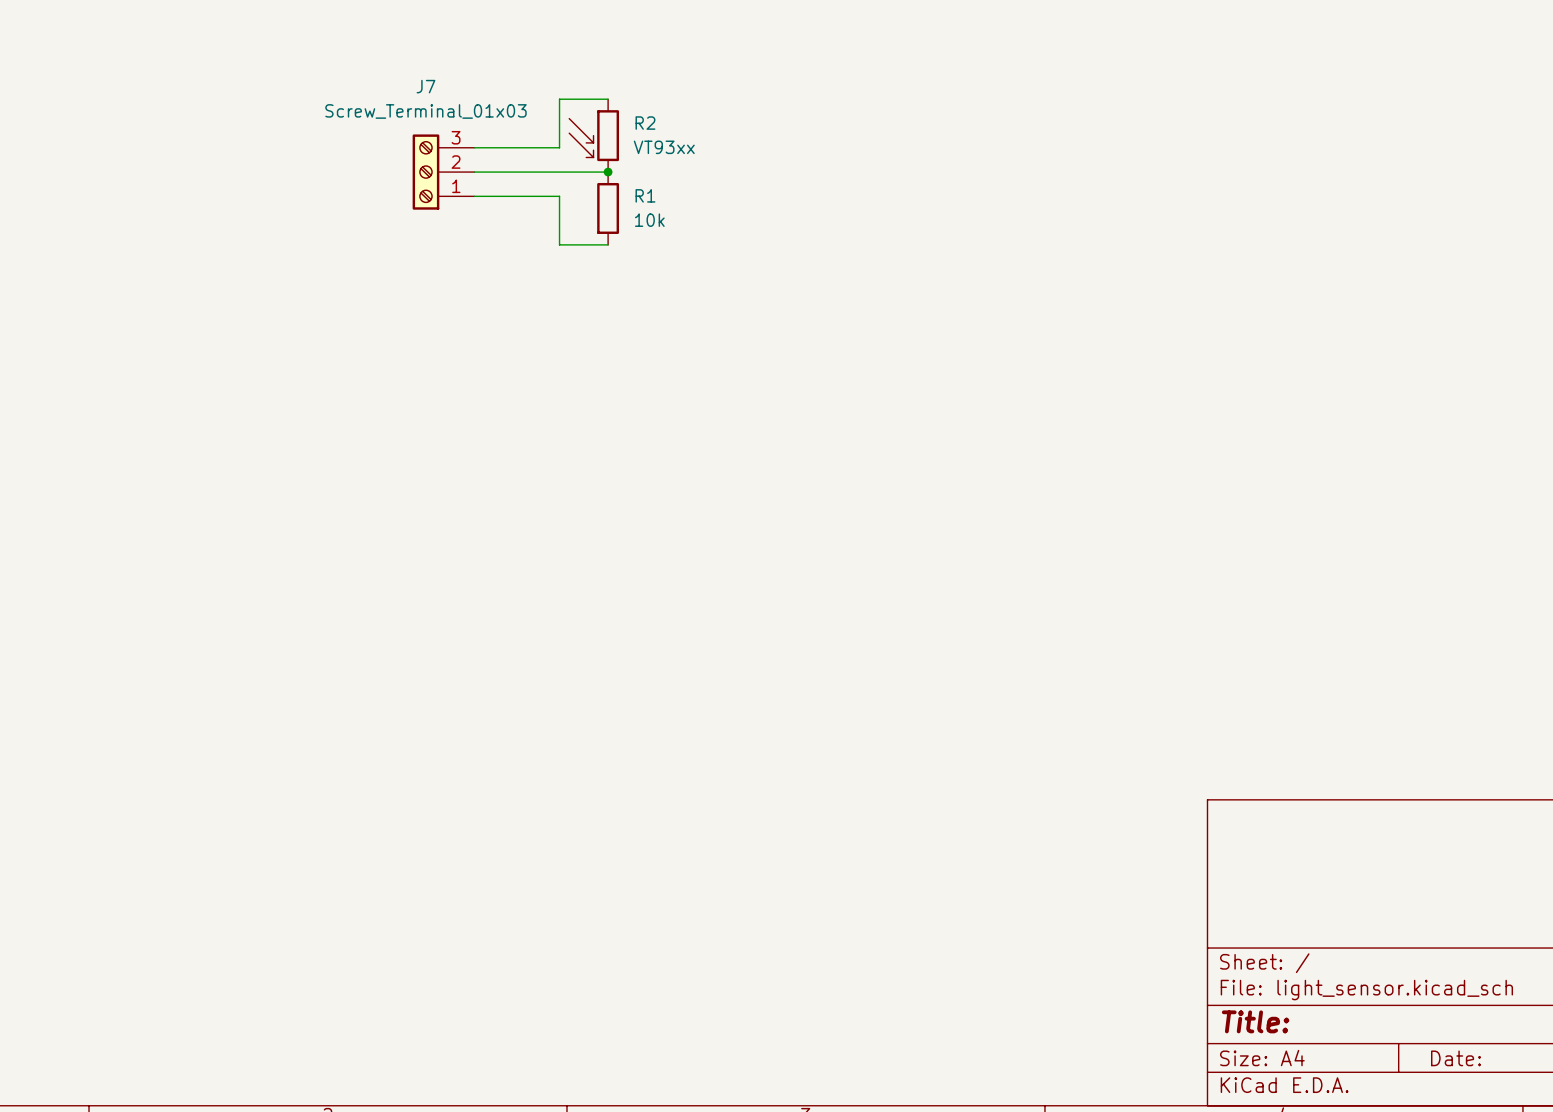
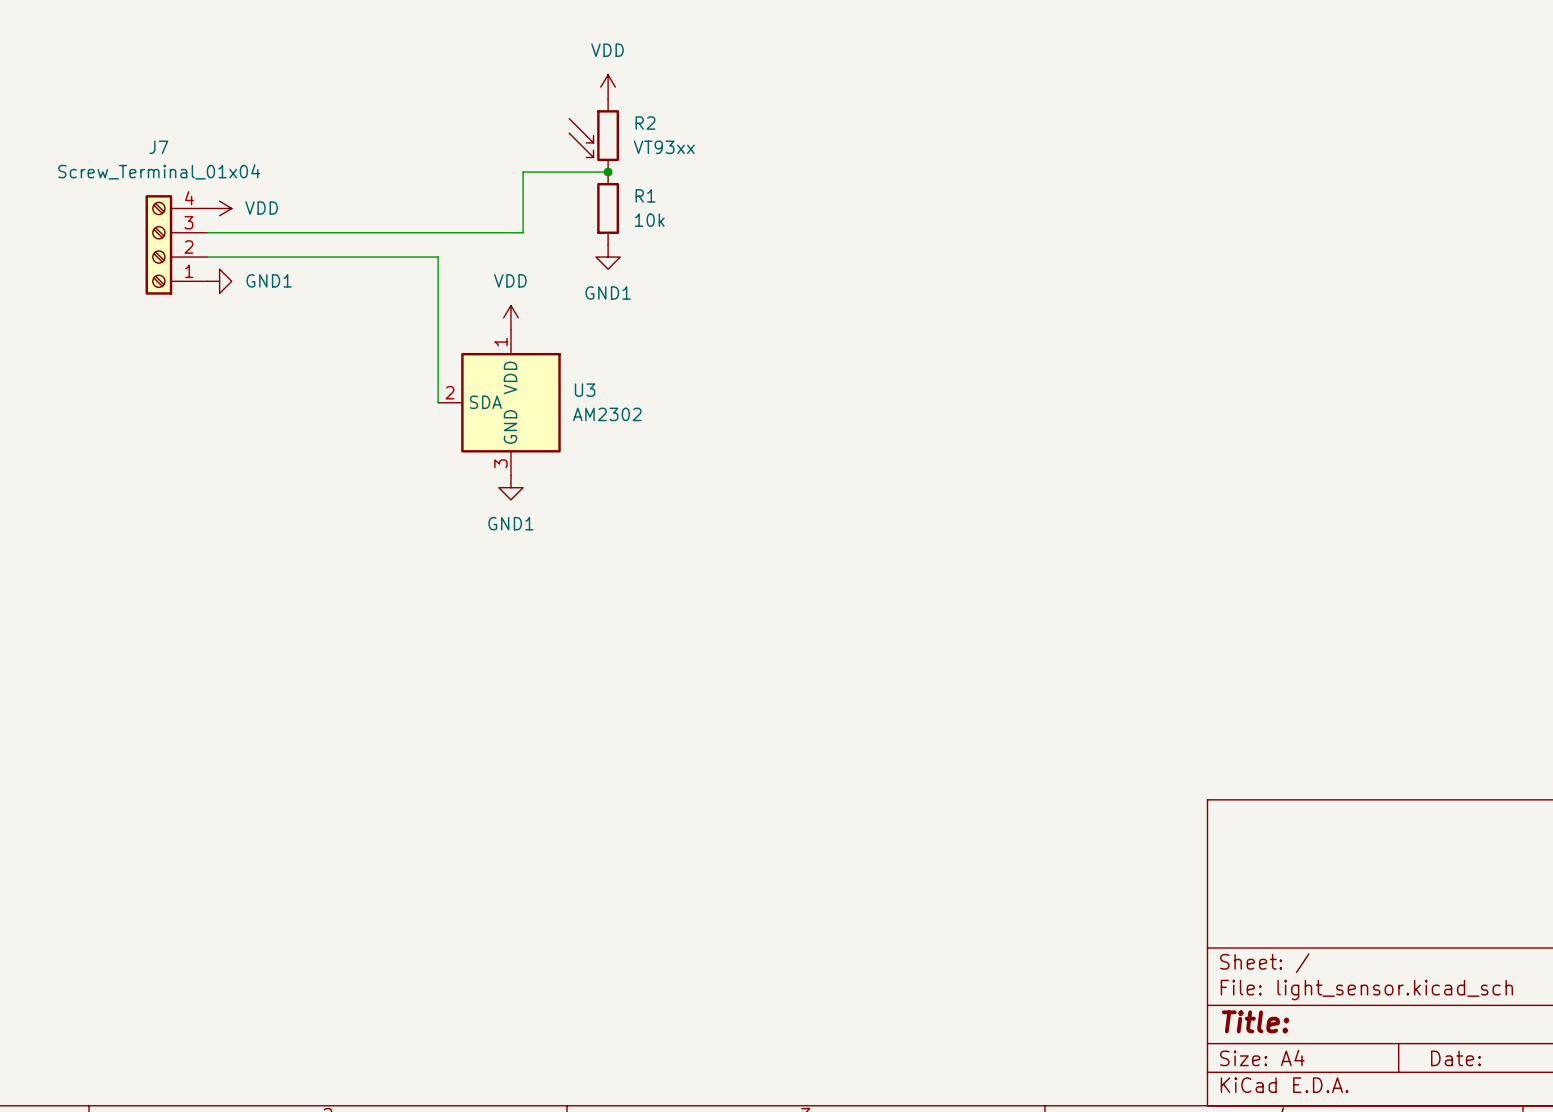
power symbol: none -> VDD (608, 87)
wire: (608, 99) (559, 99) (559, 147) (474, 147) -> none
J7 value: Screw_Terminal_01x03 (425, 111) -> Screw_Terminal_01x04 (159, 171)
J7 symbol: [412, 134, 475, 210] -> [145, 195, 208, 295]
wire: (474, 172) (523, 172) -> (207, 232) (523, 232) (523, 172)
wire: (474, 196) (559, 196) (559, 244) (608, 244) -> none
power symbol: none -> VDD (219, 208)
wire: none -> (207, 257) (438, 257) (438, 402)
power symbol: none -> GND1 (608, 257)
power symbol: none -> GND1 (219, 281)
power symbol: none -> VDD (510, 317)
U3: none -> AM2302 (499, 402)
power symbol: none -> GND1 (510, 487)

